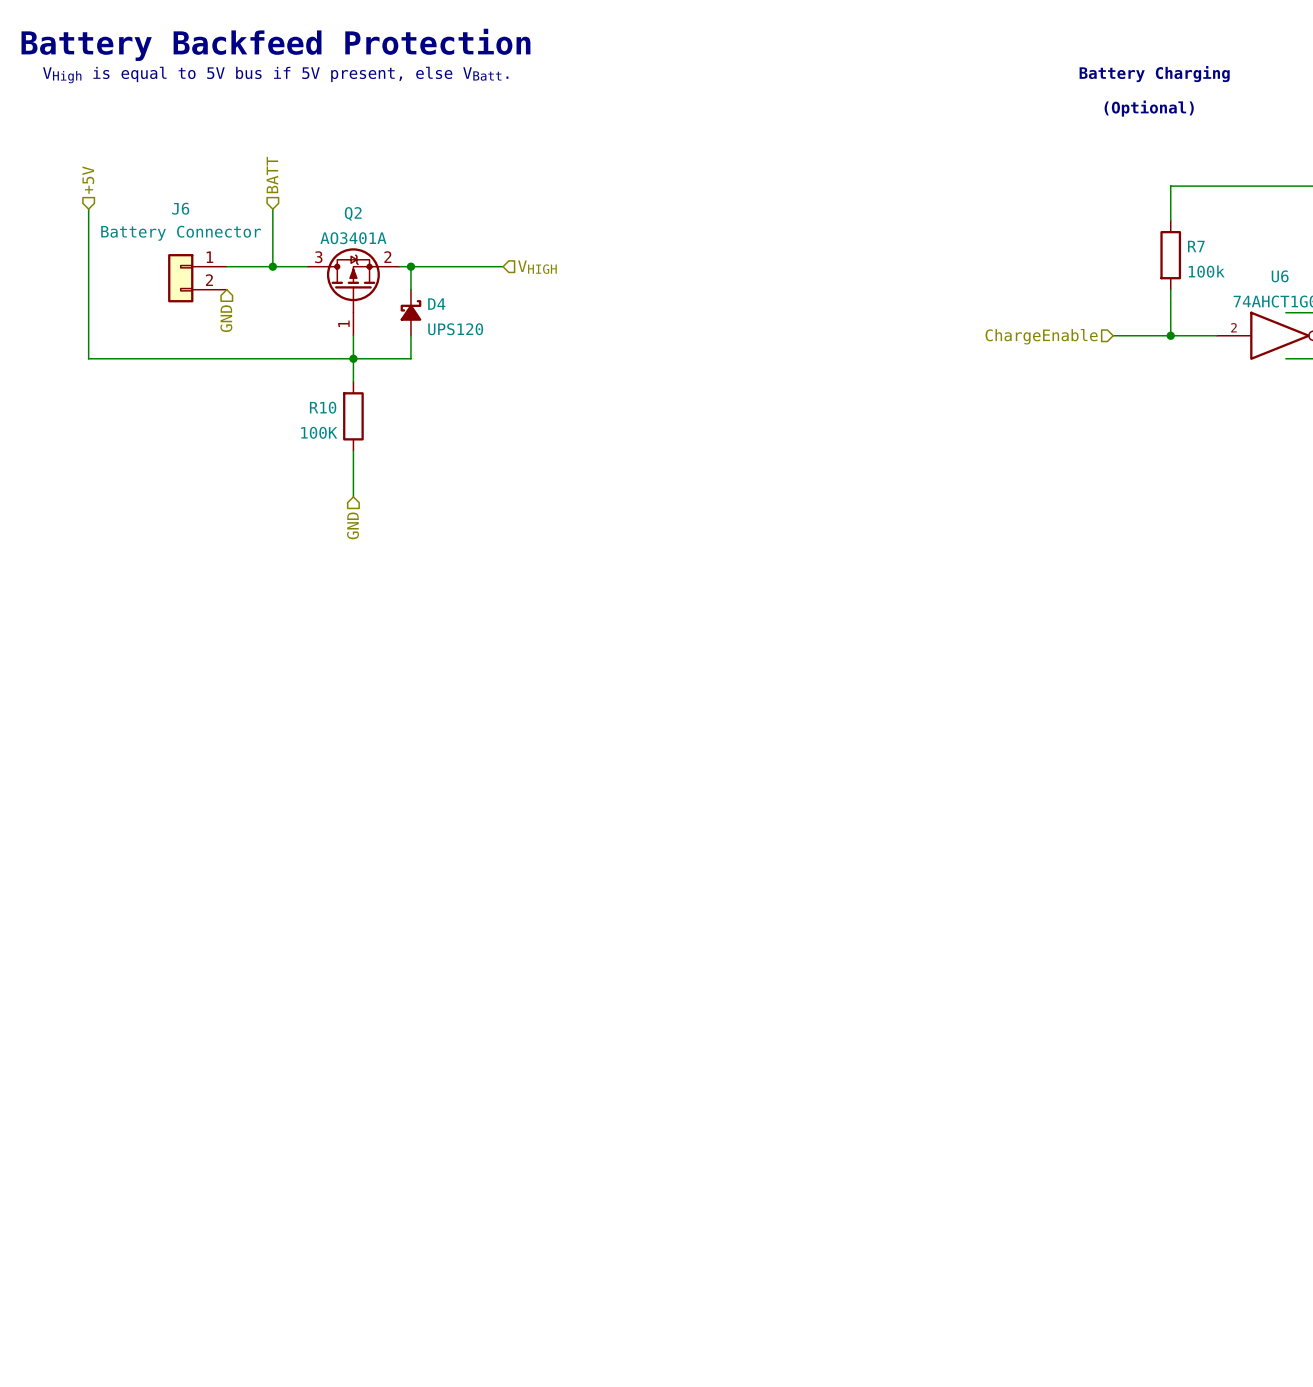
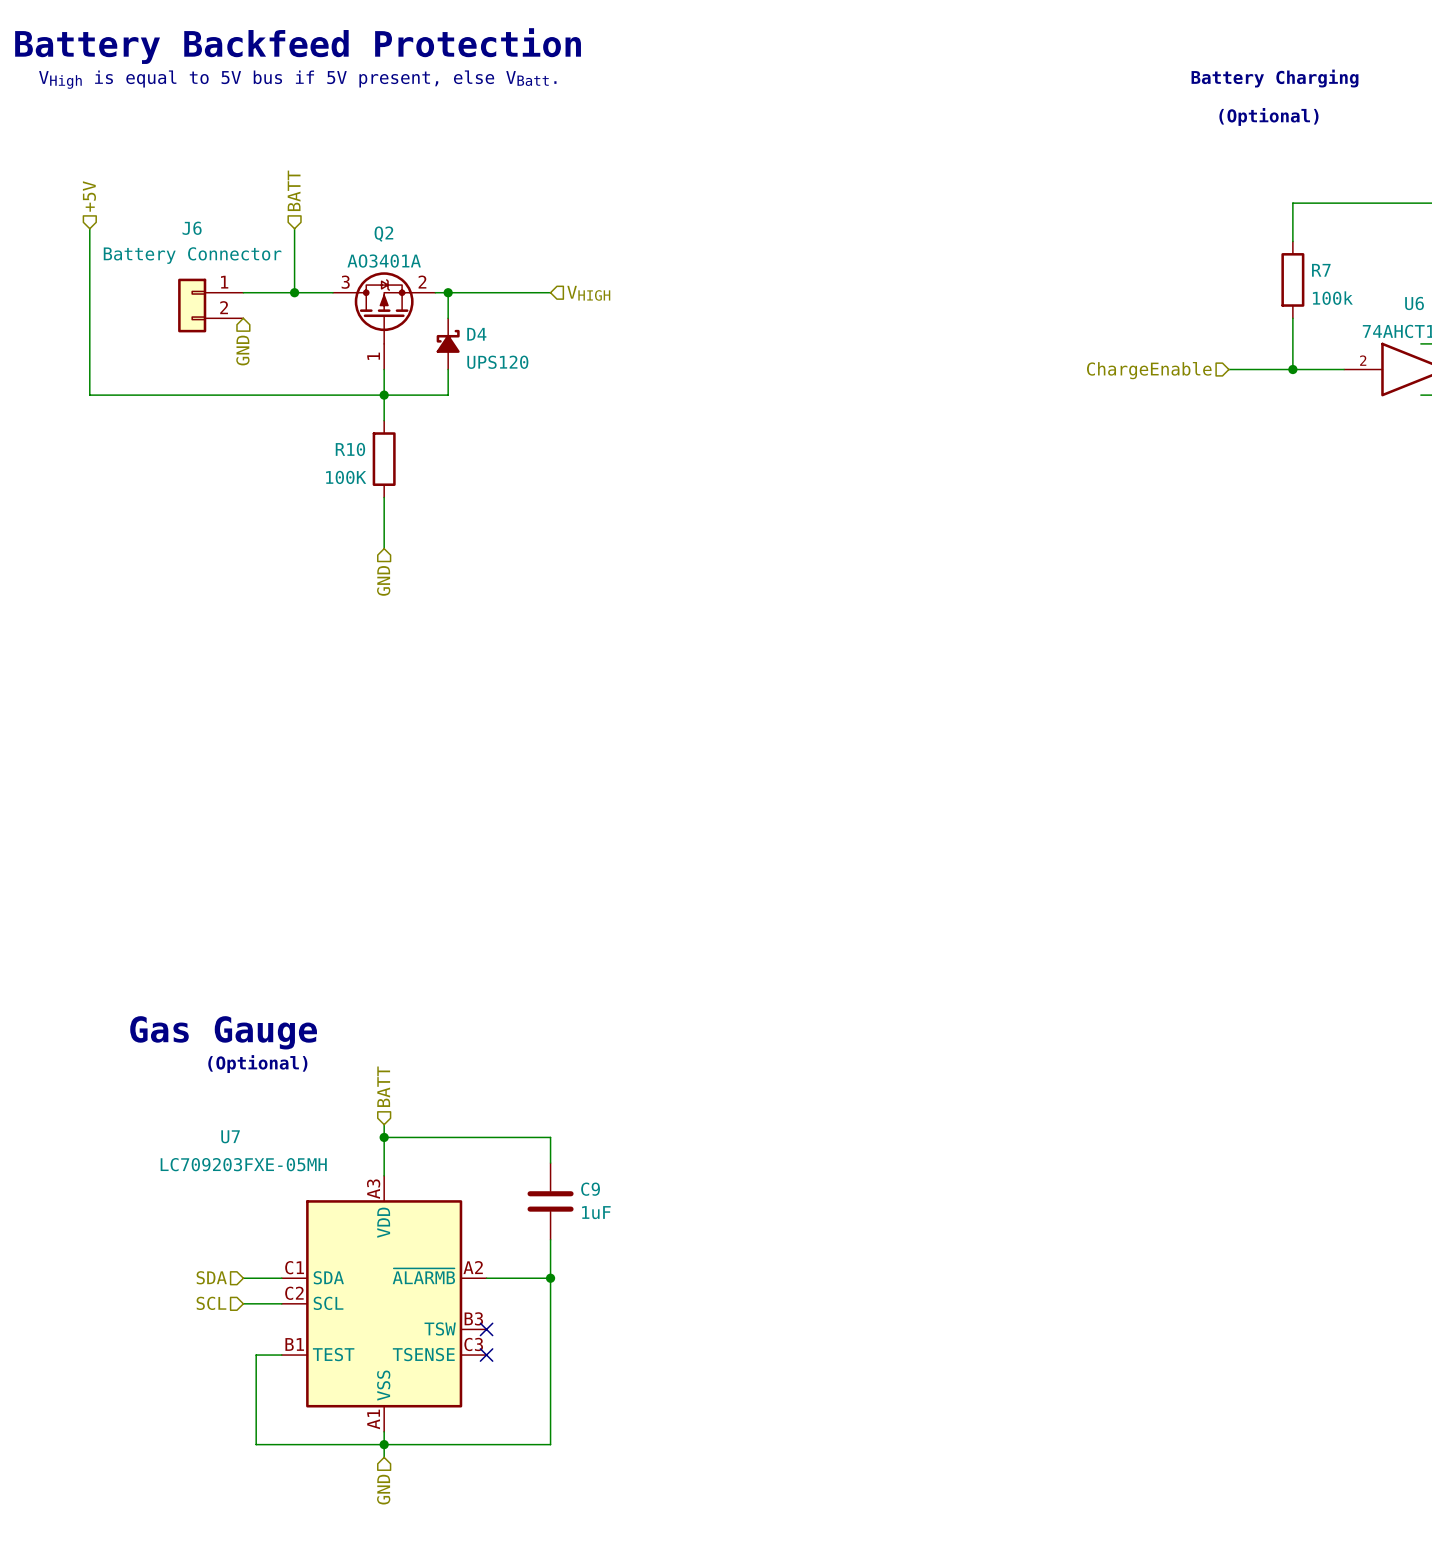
text: none -> Gas Gauge (223, 1032)
text: none -> (Optional) (257, 1064)
hierarchical label: none -> BATT (383, 1086)
wire: none -> (384, 1124) (384, 1175)
wire: none -> (384, 1137) (550, 1137) (550, 1163)
junction: none -> (384, 1137)
C9: none -> 1uF (550, 1201)
wire: none -> (550, 1239) (550, 1444) (256, 1444) (256, 1355) (281, 1355)
hierarchical label: none -> SDA (211, 1277)
wire: none -> (243, 1278) (281, 1278)
wire: none -> (486, 1278) (550, 1278)
junction: none -> (550, 1278)
hierarchical label: none -> SCL (211, 1303)
wire: none -> (243, 1303) (281, 1303)
U7: none -> LC709203FXE-05MH (384, 1303)
no-connect mark: none -> (486, 1329)
no-connect mark: none -> (486, 1355)
wire: none -> (384, 1431) (384, 1457)
junction: none -> (384, 1444)
hierarchical label: none -> GND (383, 1489)

